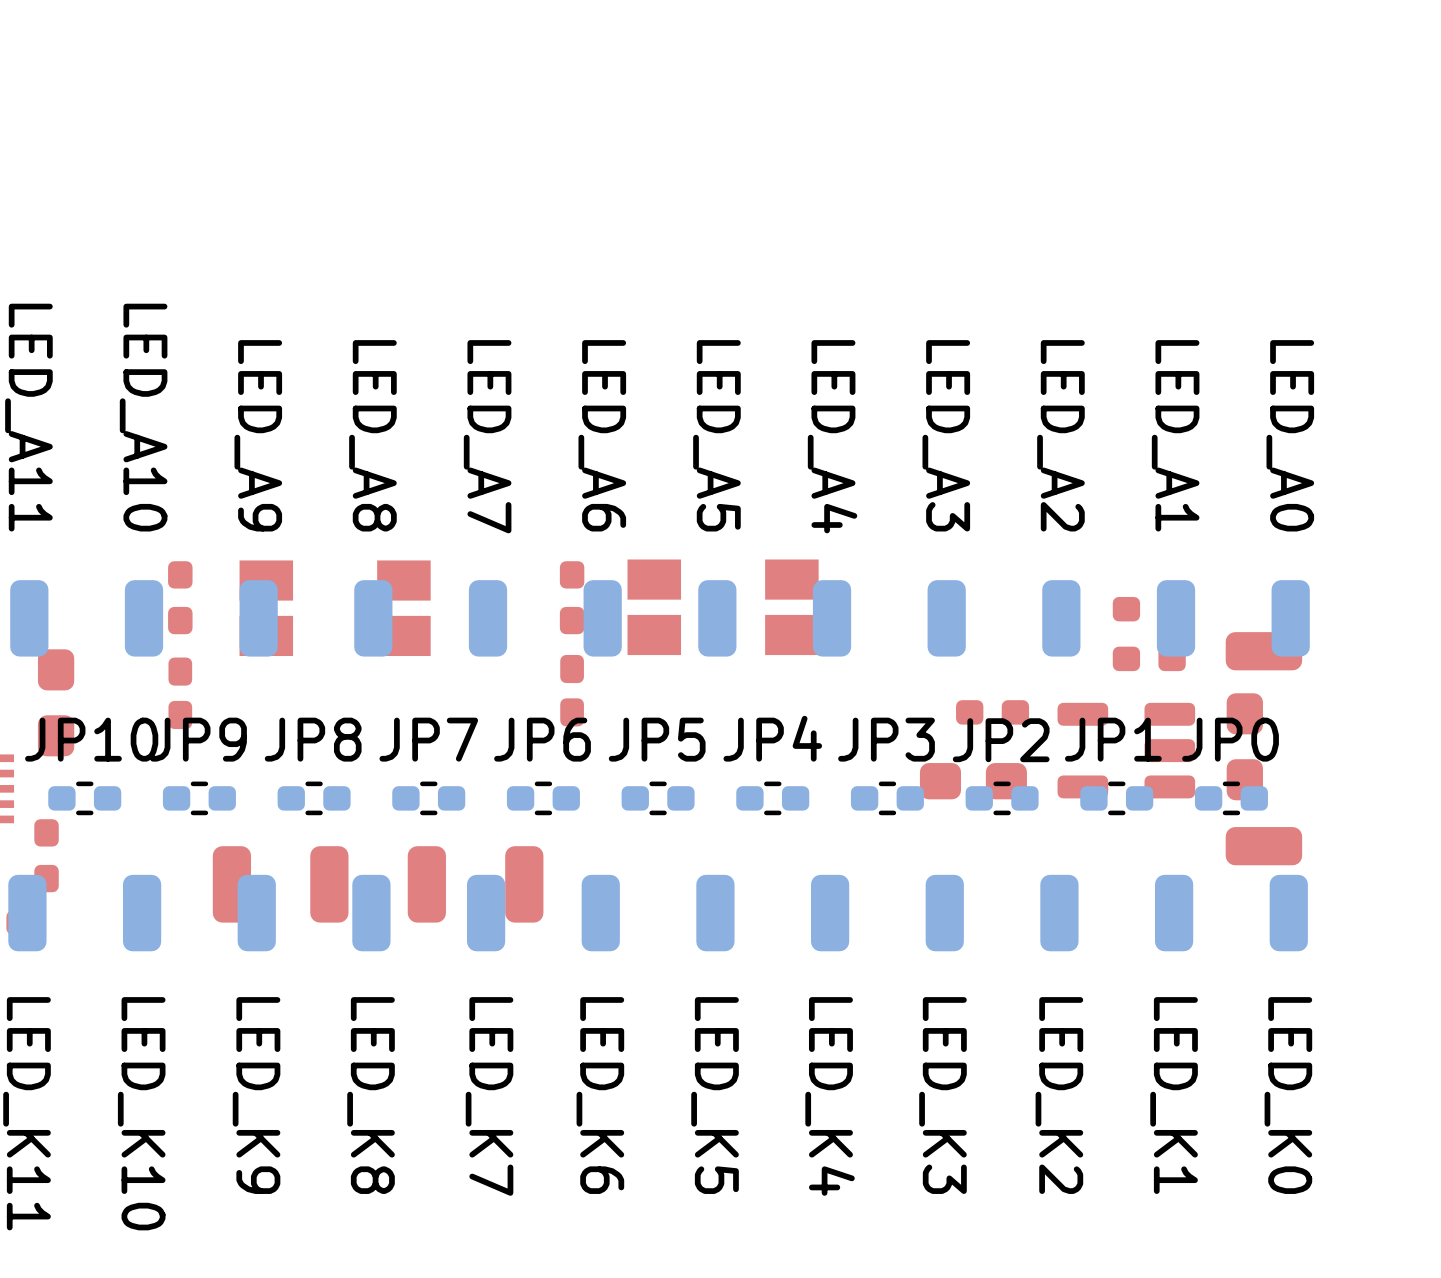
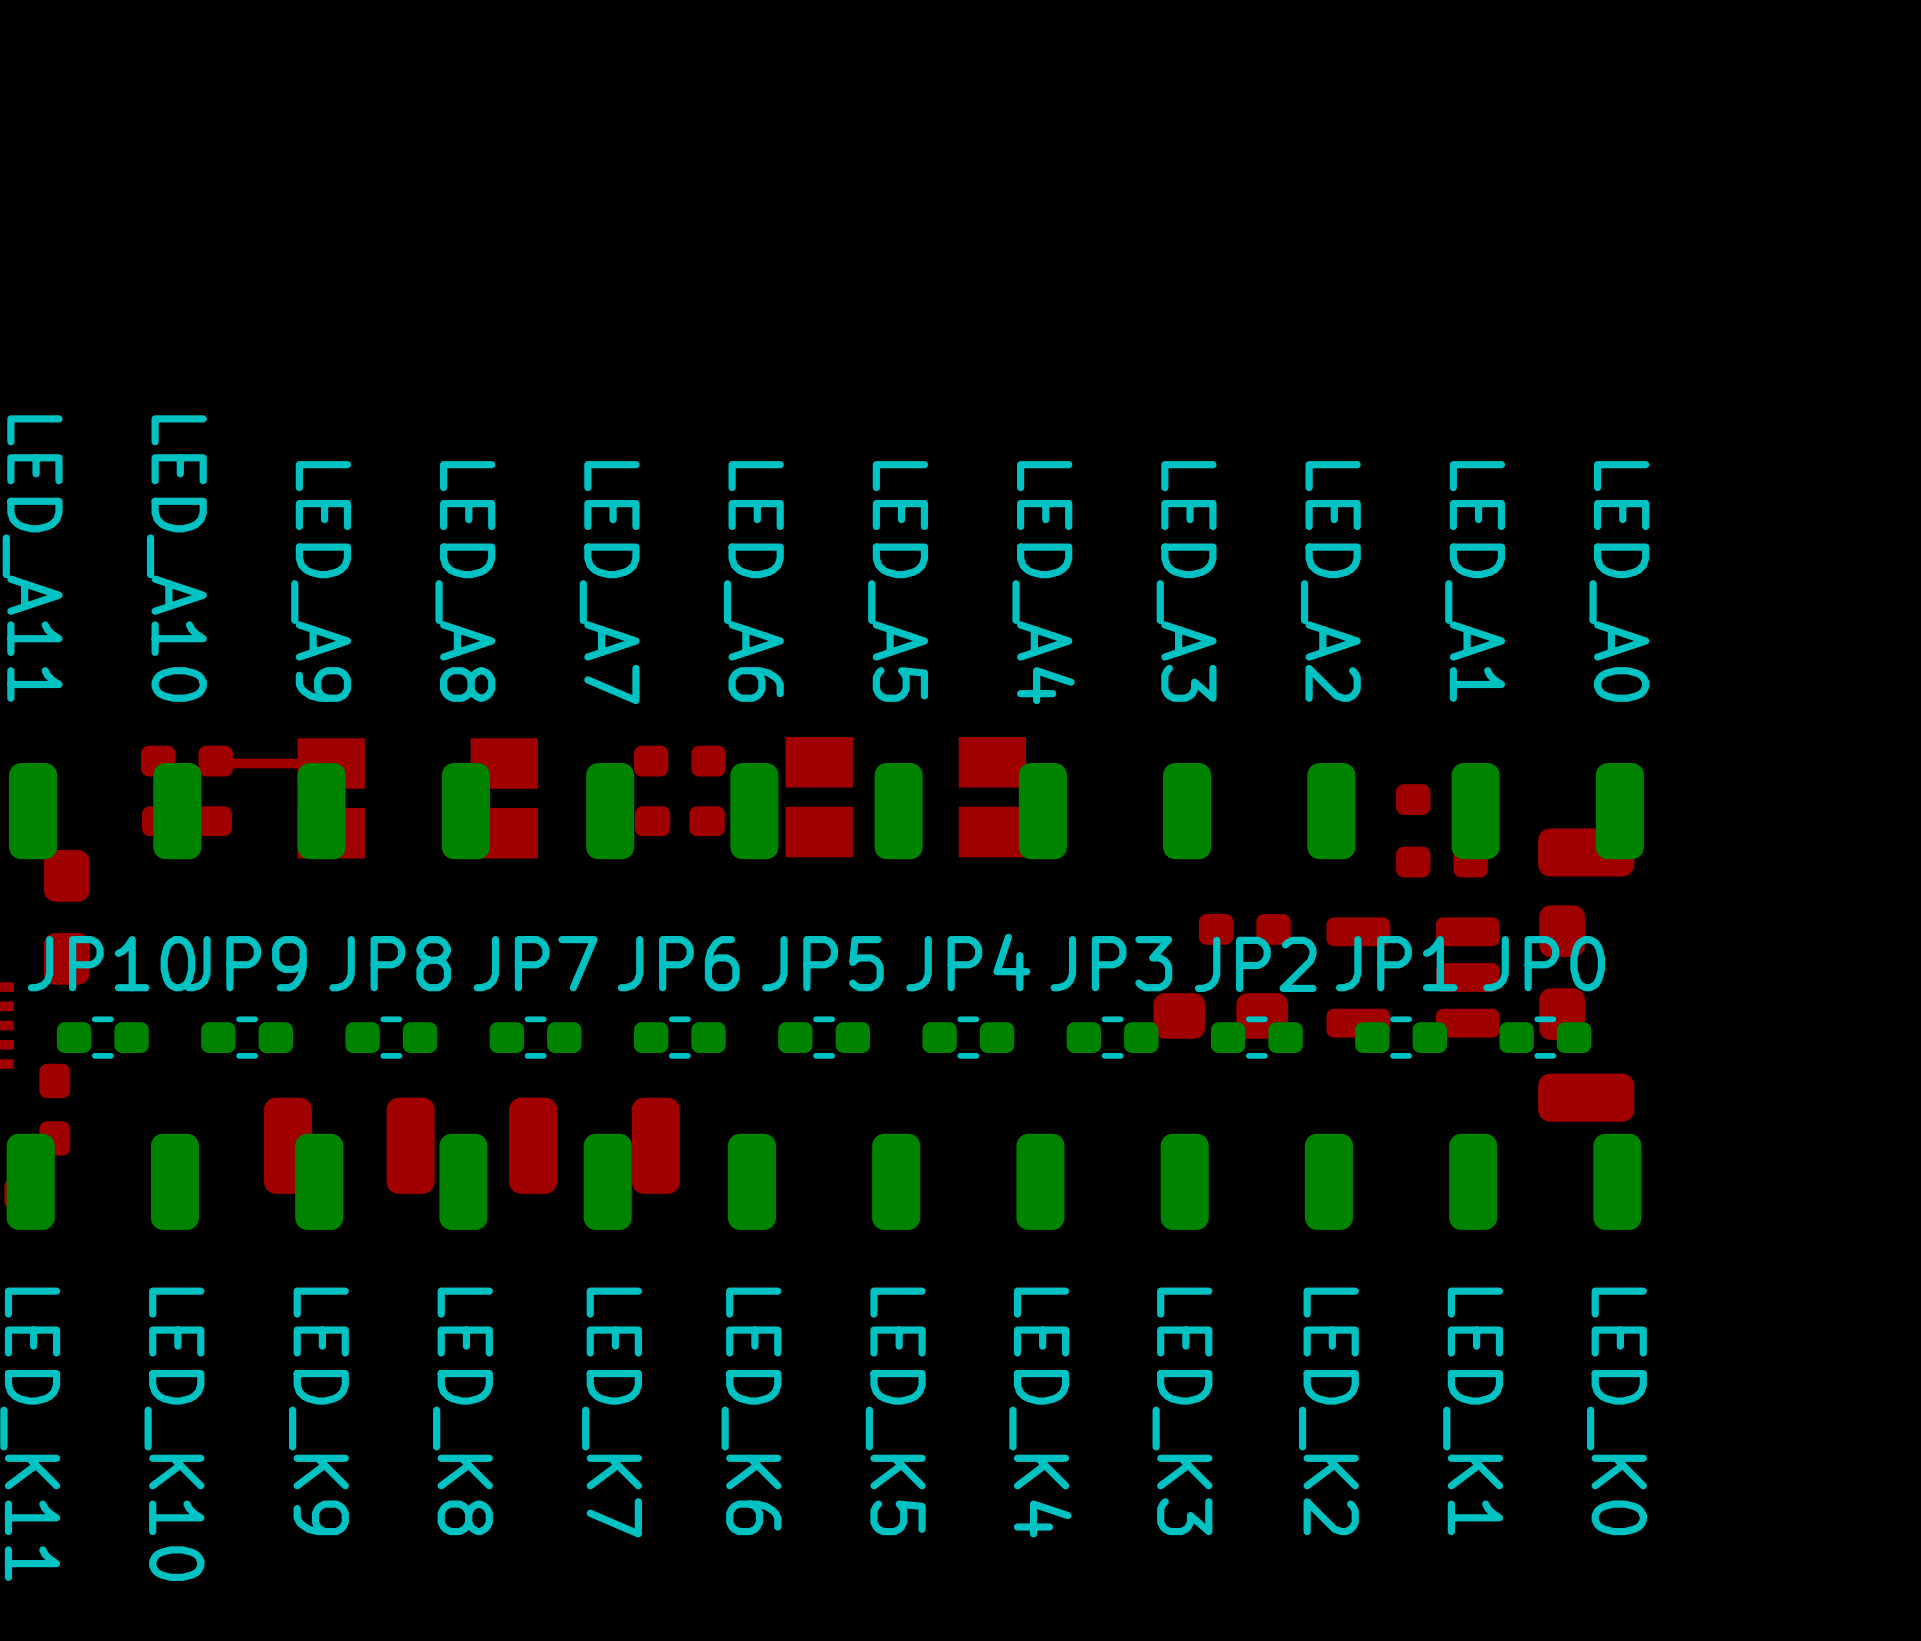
top track: none -> (227, 761) (230, 763) (331, 763)
part rotation: 0° (180, 597) -> 90° clockwise (186, 761)
part rotation: 0° (572, 597) -> 90° clockwise (679, 761)
part rotation: 0° (572, 690) -> 90° clockwise (679, 821)
part position: (572, 690) -> (679, 821)
part rotation: 0° (180, 693) -> 90° clockwise (186, 821)
part position: (180, 693) -> (186, 821)

